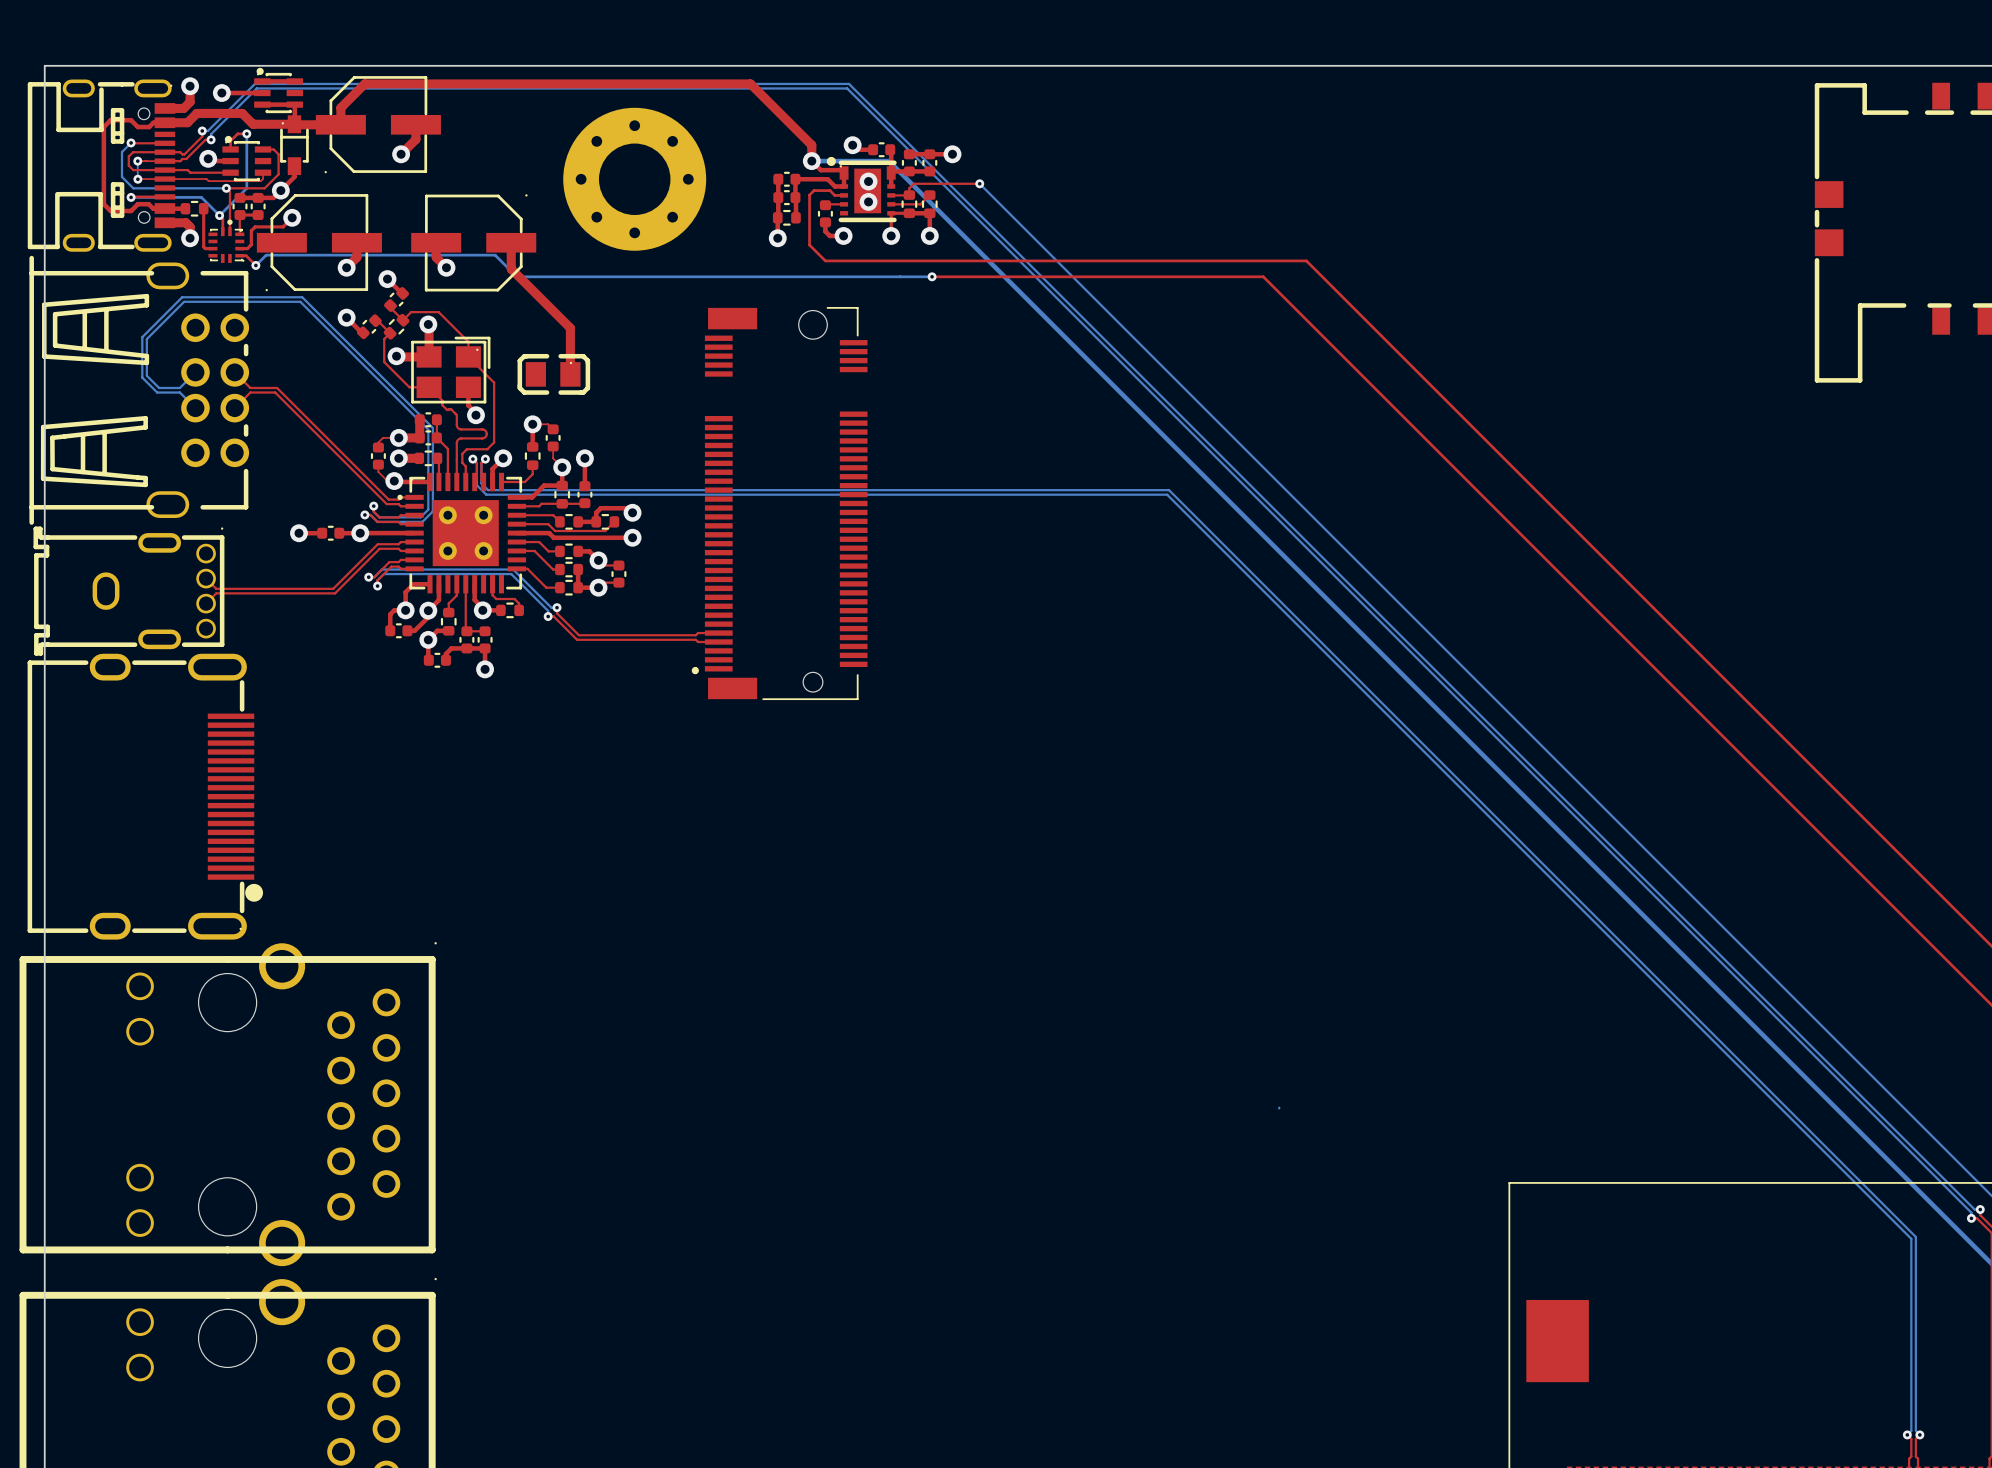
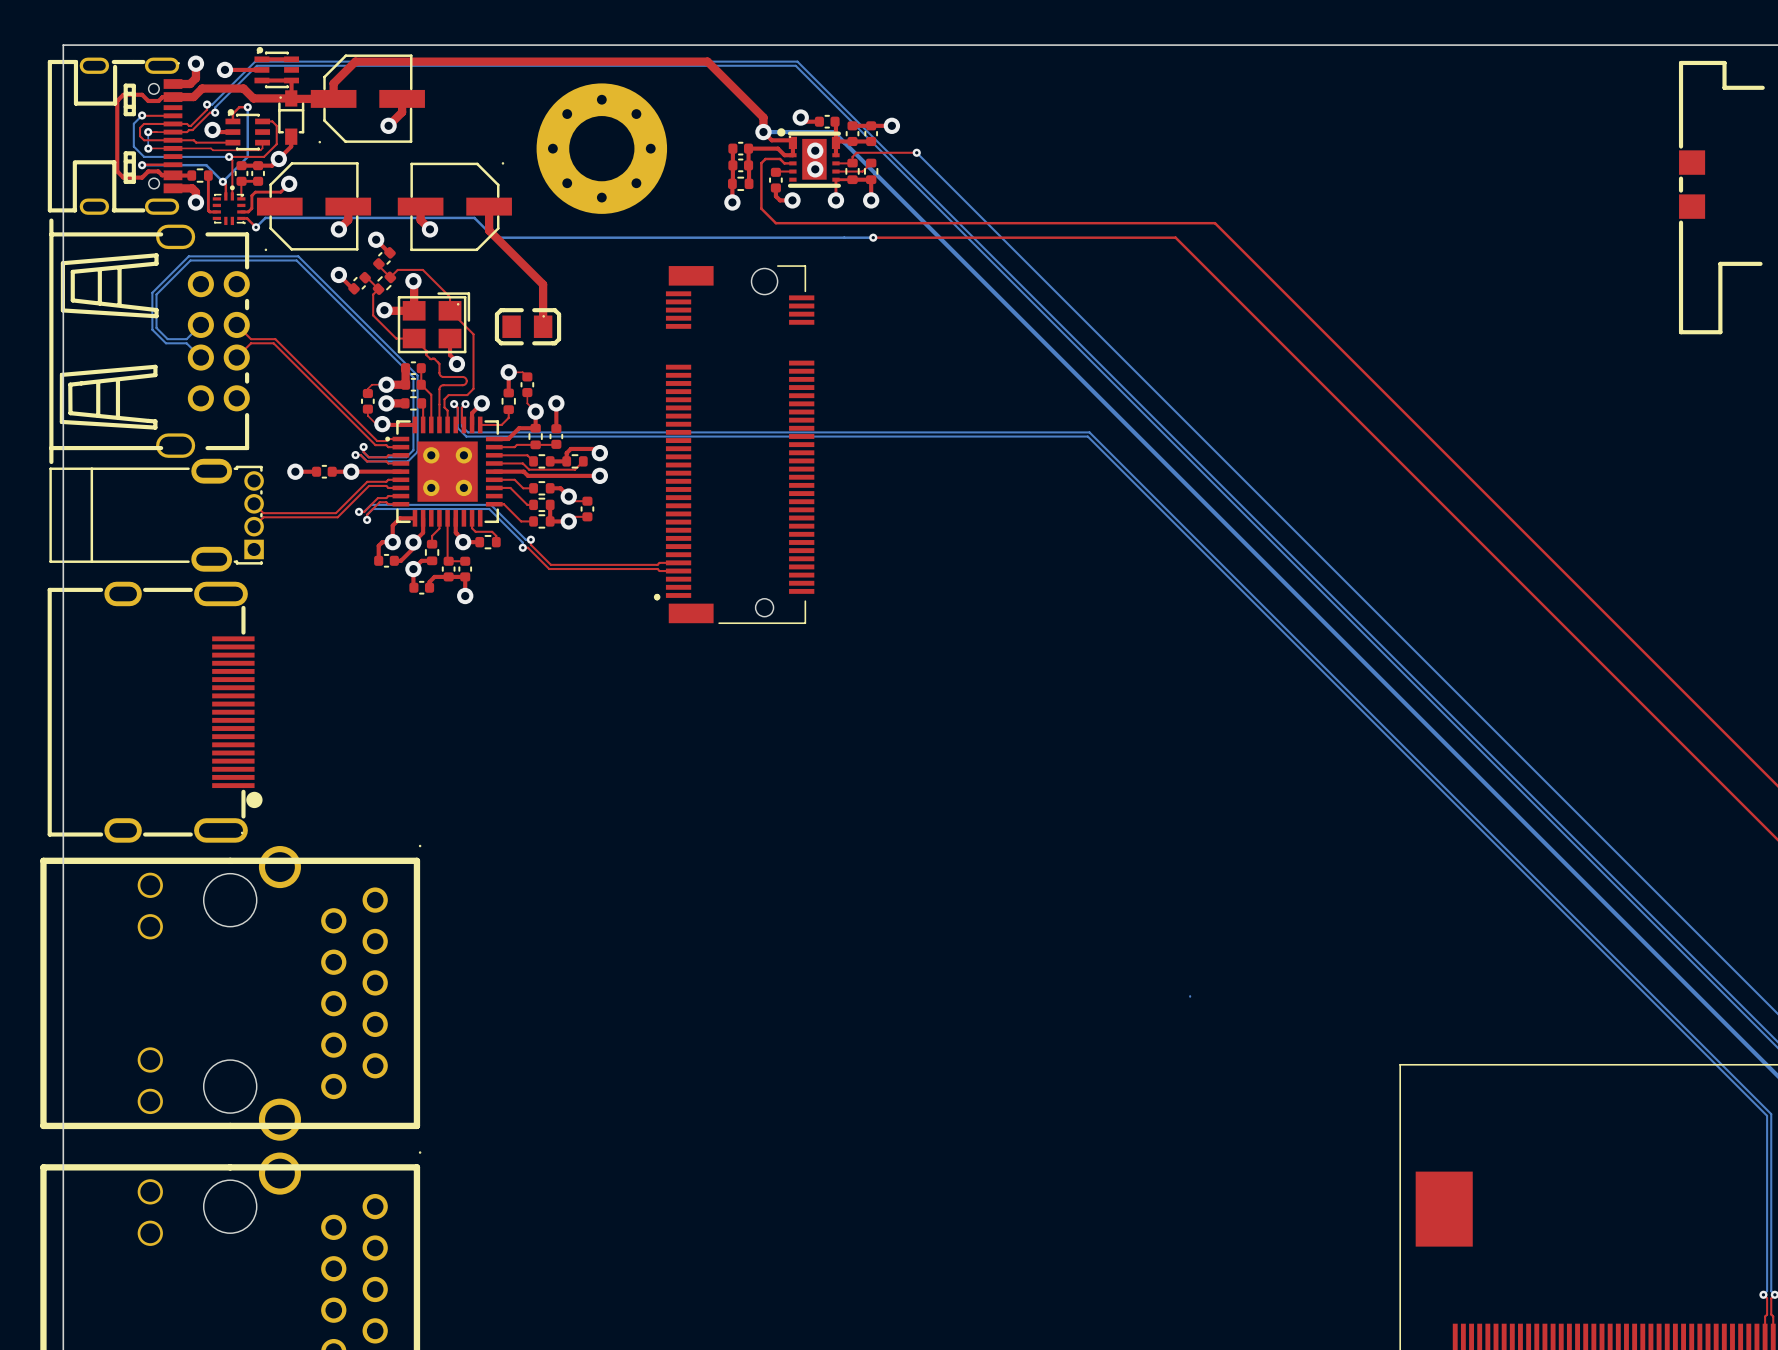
line: none -> (91, 468) (50, 468) (50, 561) (91, 561)
top track: (206, 578) (216, 588) (333, 588) (343, 578) -> (254, 503) (263, 513) (335, 513)
part: none -> (177, 515)
top track: (345, 583) (335, 593) (216, 593) (206, 603) -> (337, 517) (263, 517) (254, 526)
part: (128, 591) -> none

